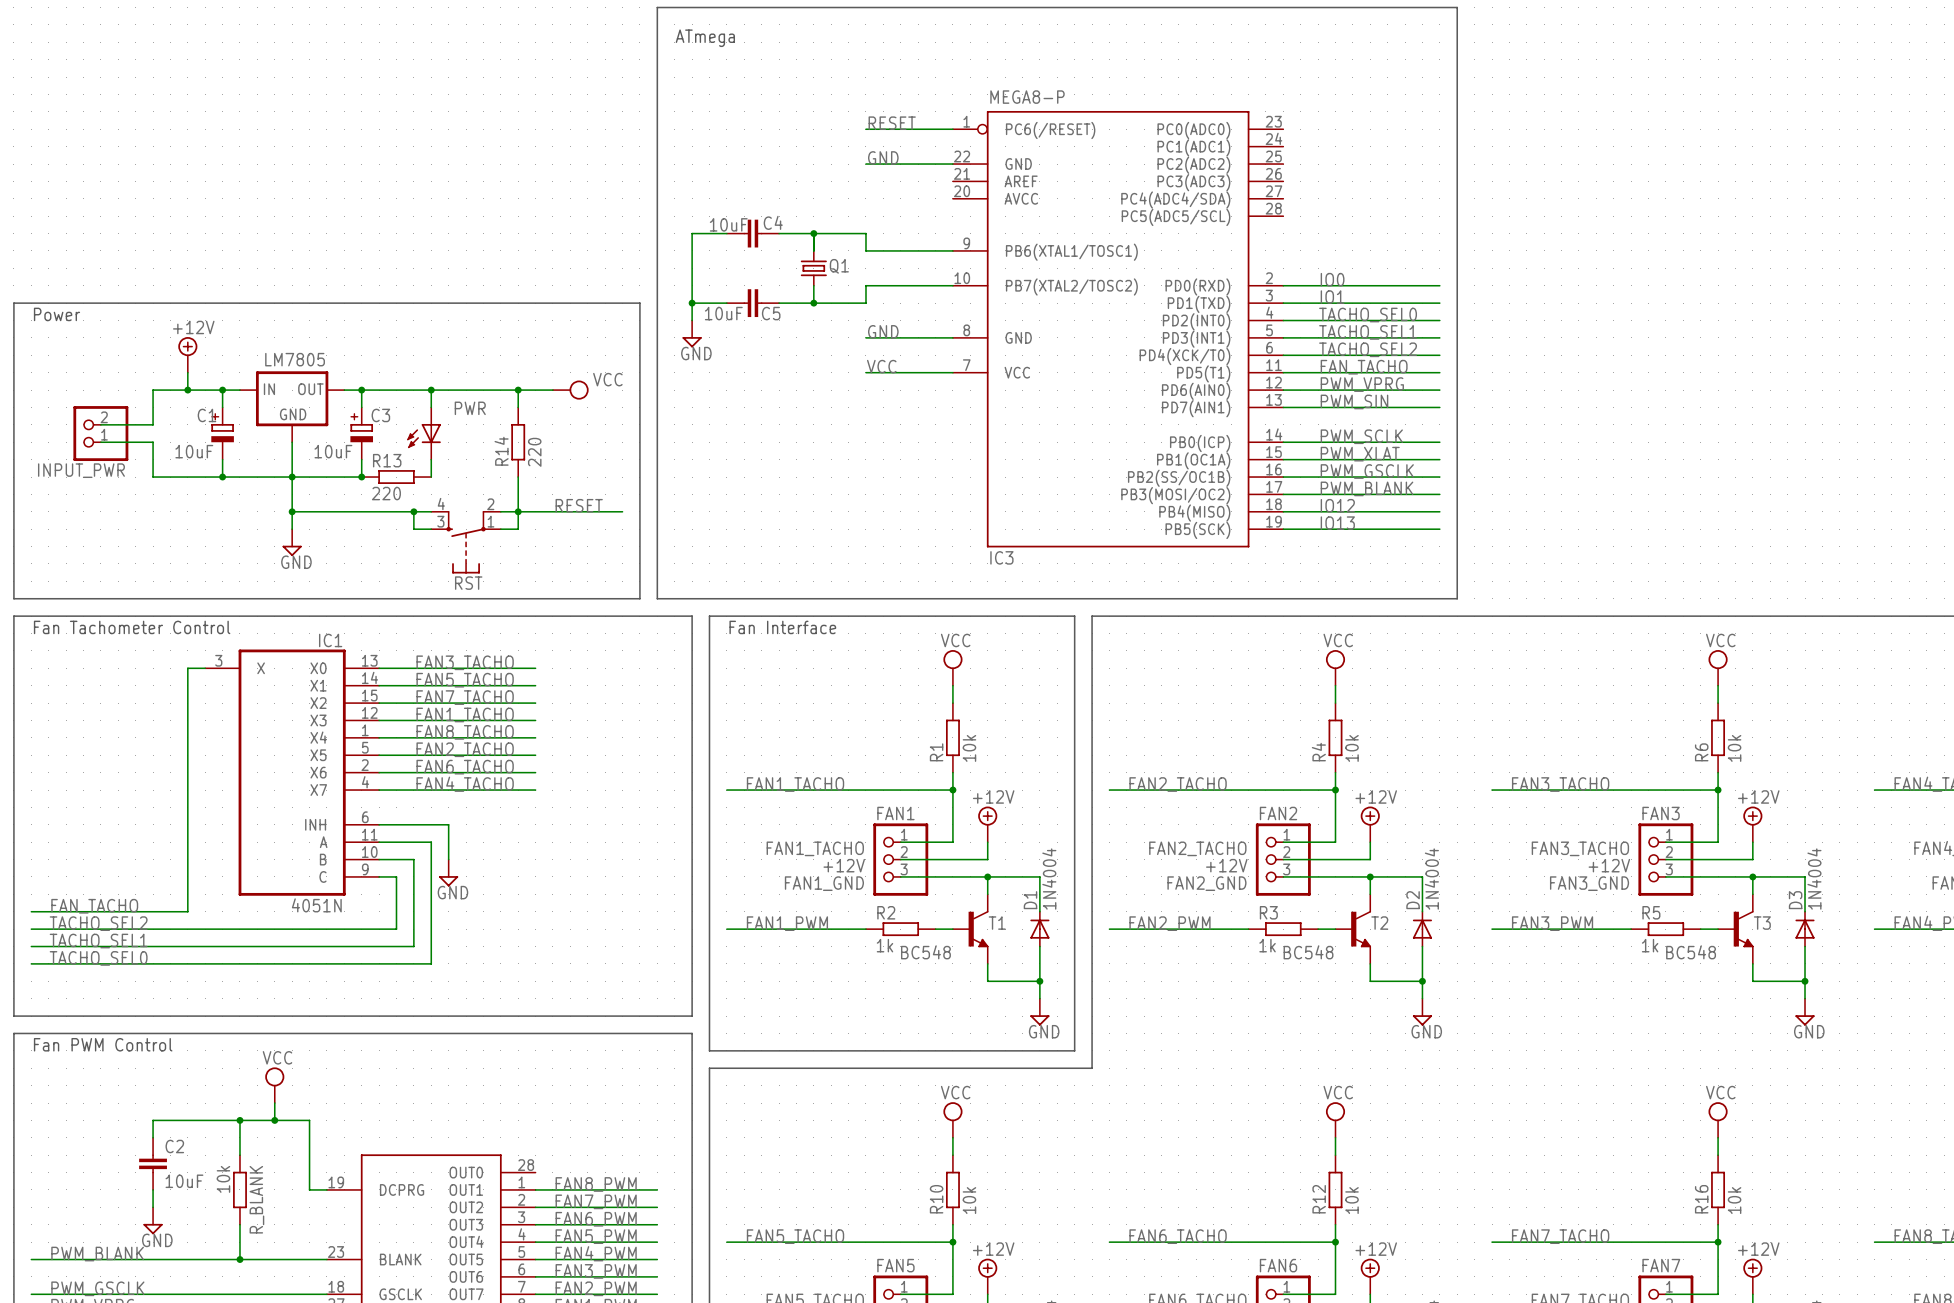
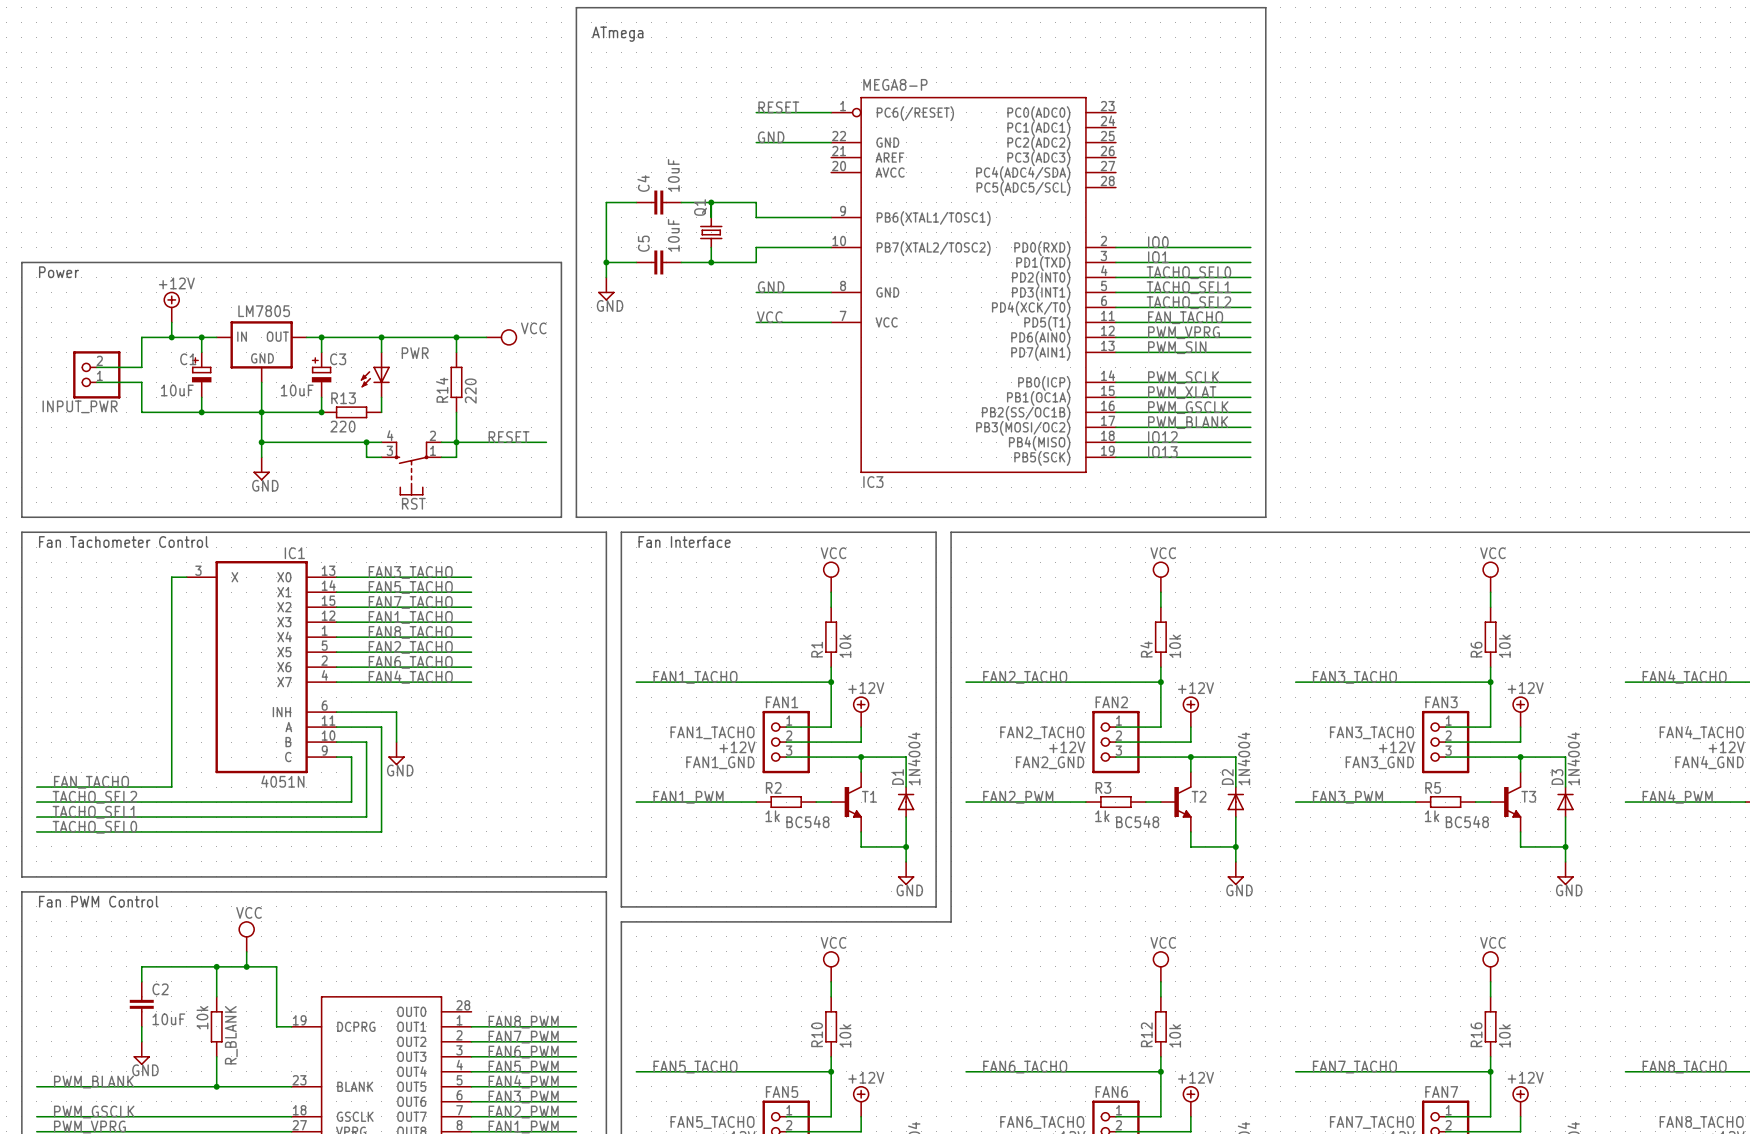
C4 name rotation: 0° (773, 222) -> 90° counterclockwise (643, 183)
C4 name position: C4 (773, 222) -> C4 (643, 183)
C4 value rotation: 0° (728, 224) -> 90° counterclockwise (673, 175)
C4 value position: 10uF (728, 224) -> 10uF (673, 175)
Q1 name rotation: 0° (839, 266) -> 90° counterclockwise (700, 207)
Q1 name position: Q1 (839, 266) -> Q1 (700, 207)
C5 value rotation: 0° (723, 313) -> 90° counterclockwise (673, 235)
C5 value position: 10uF (723, 313) -> 10uF (673, 235)
C5 name rotation: 0° (771, 313) -> 90° counterclockwise (643, 243)
C5 name position: C5 (771, 313) -> C5 (643, 243)

